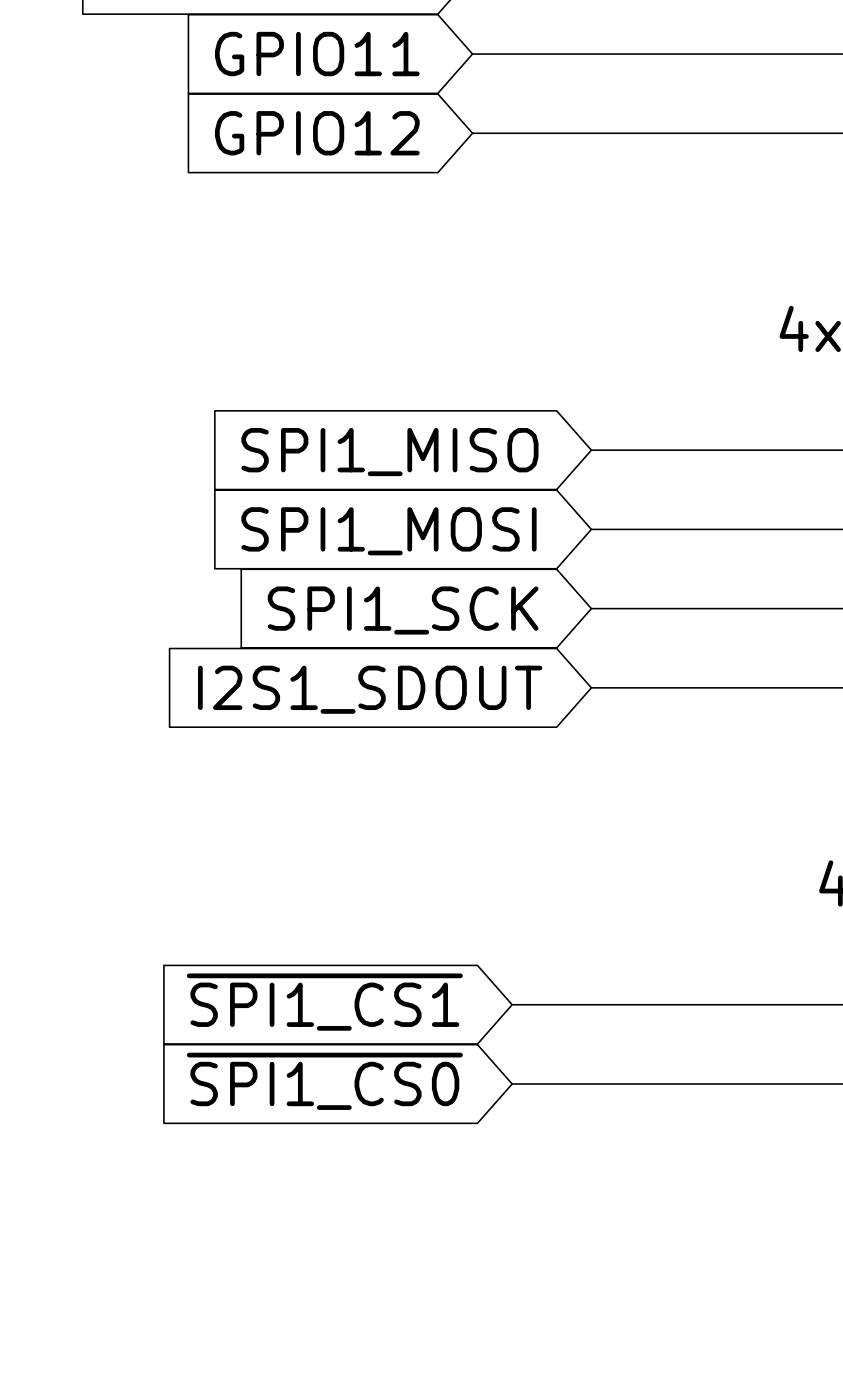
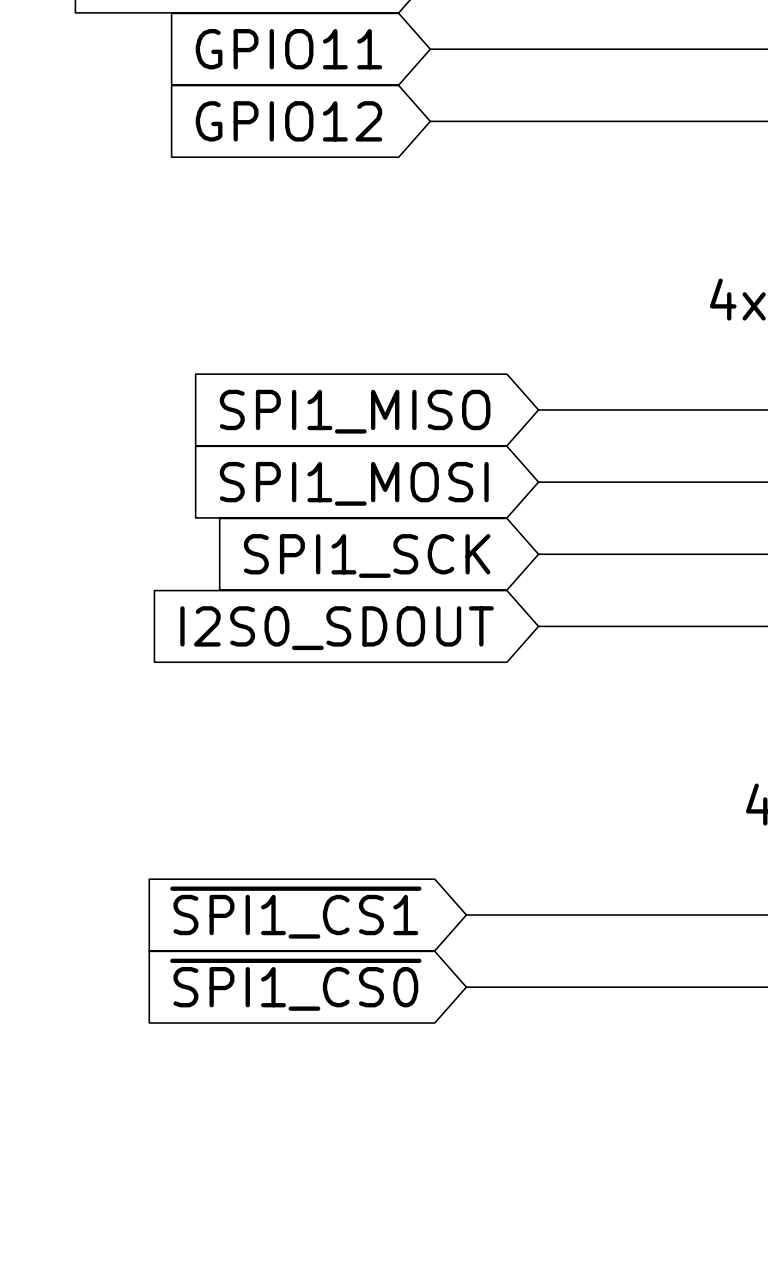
global label: I2S1_SDOUT (370, 689) -> I2S0_SDOUT (337, 628)

